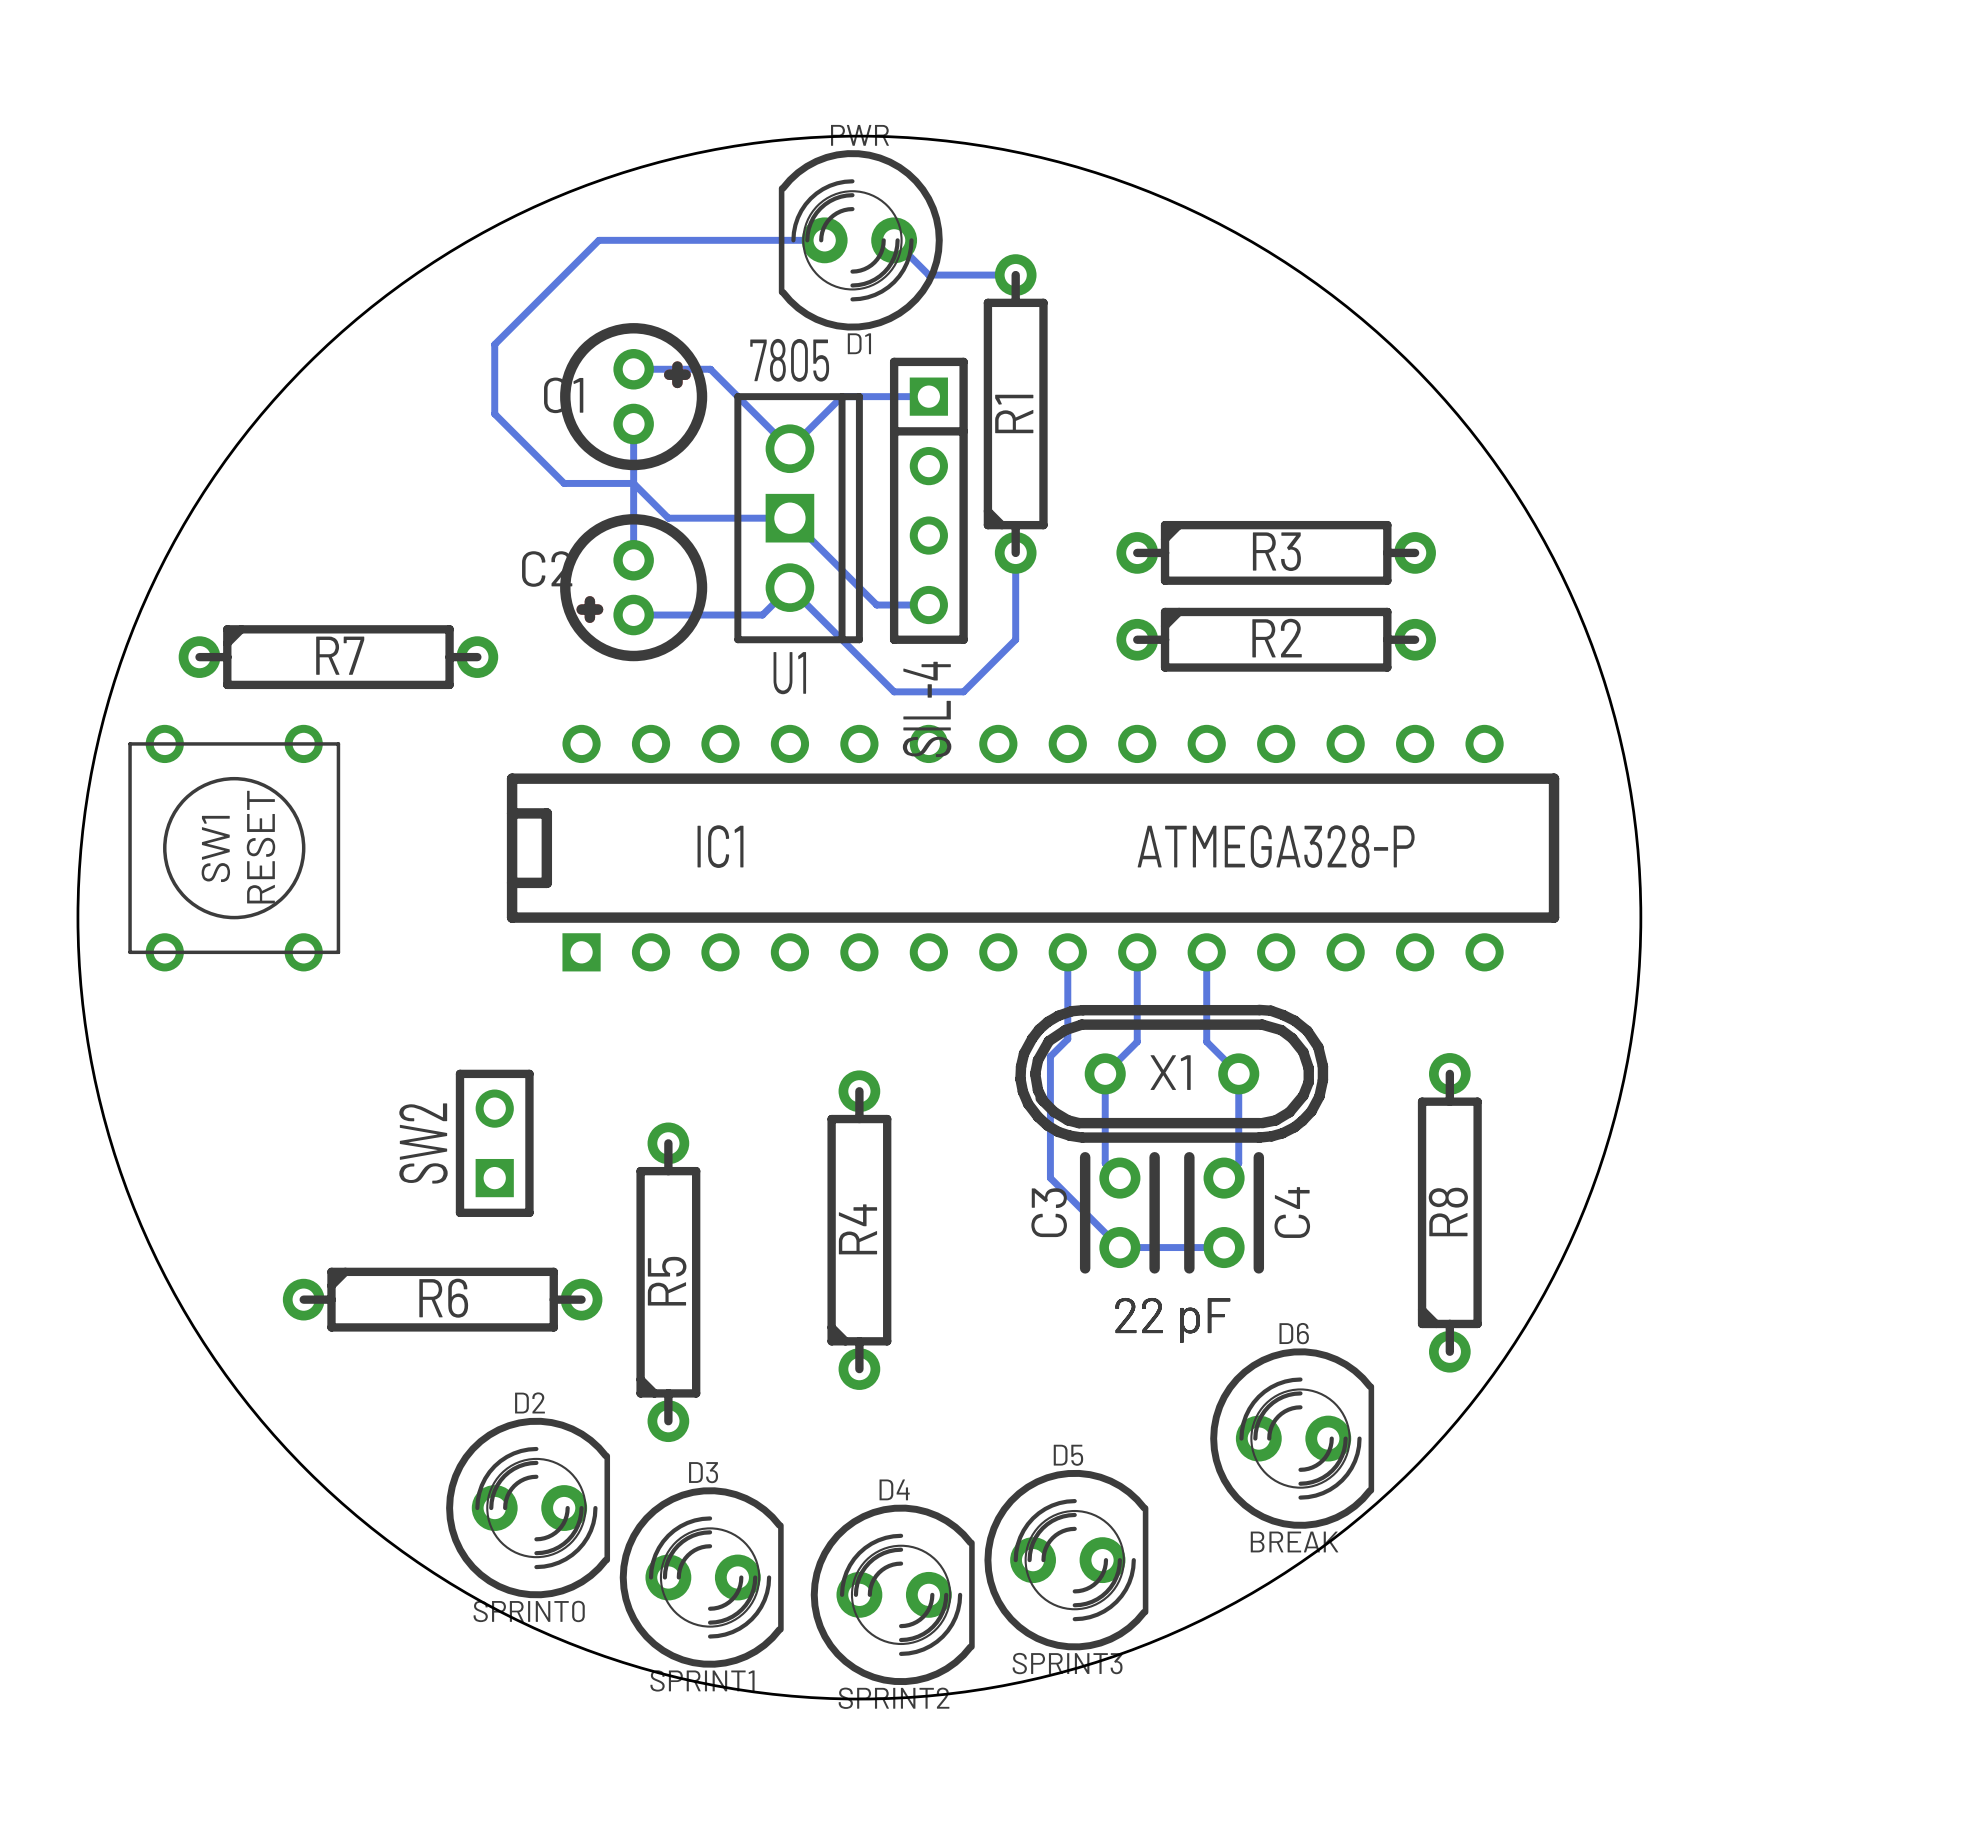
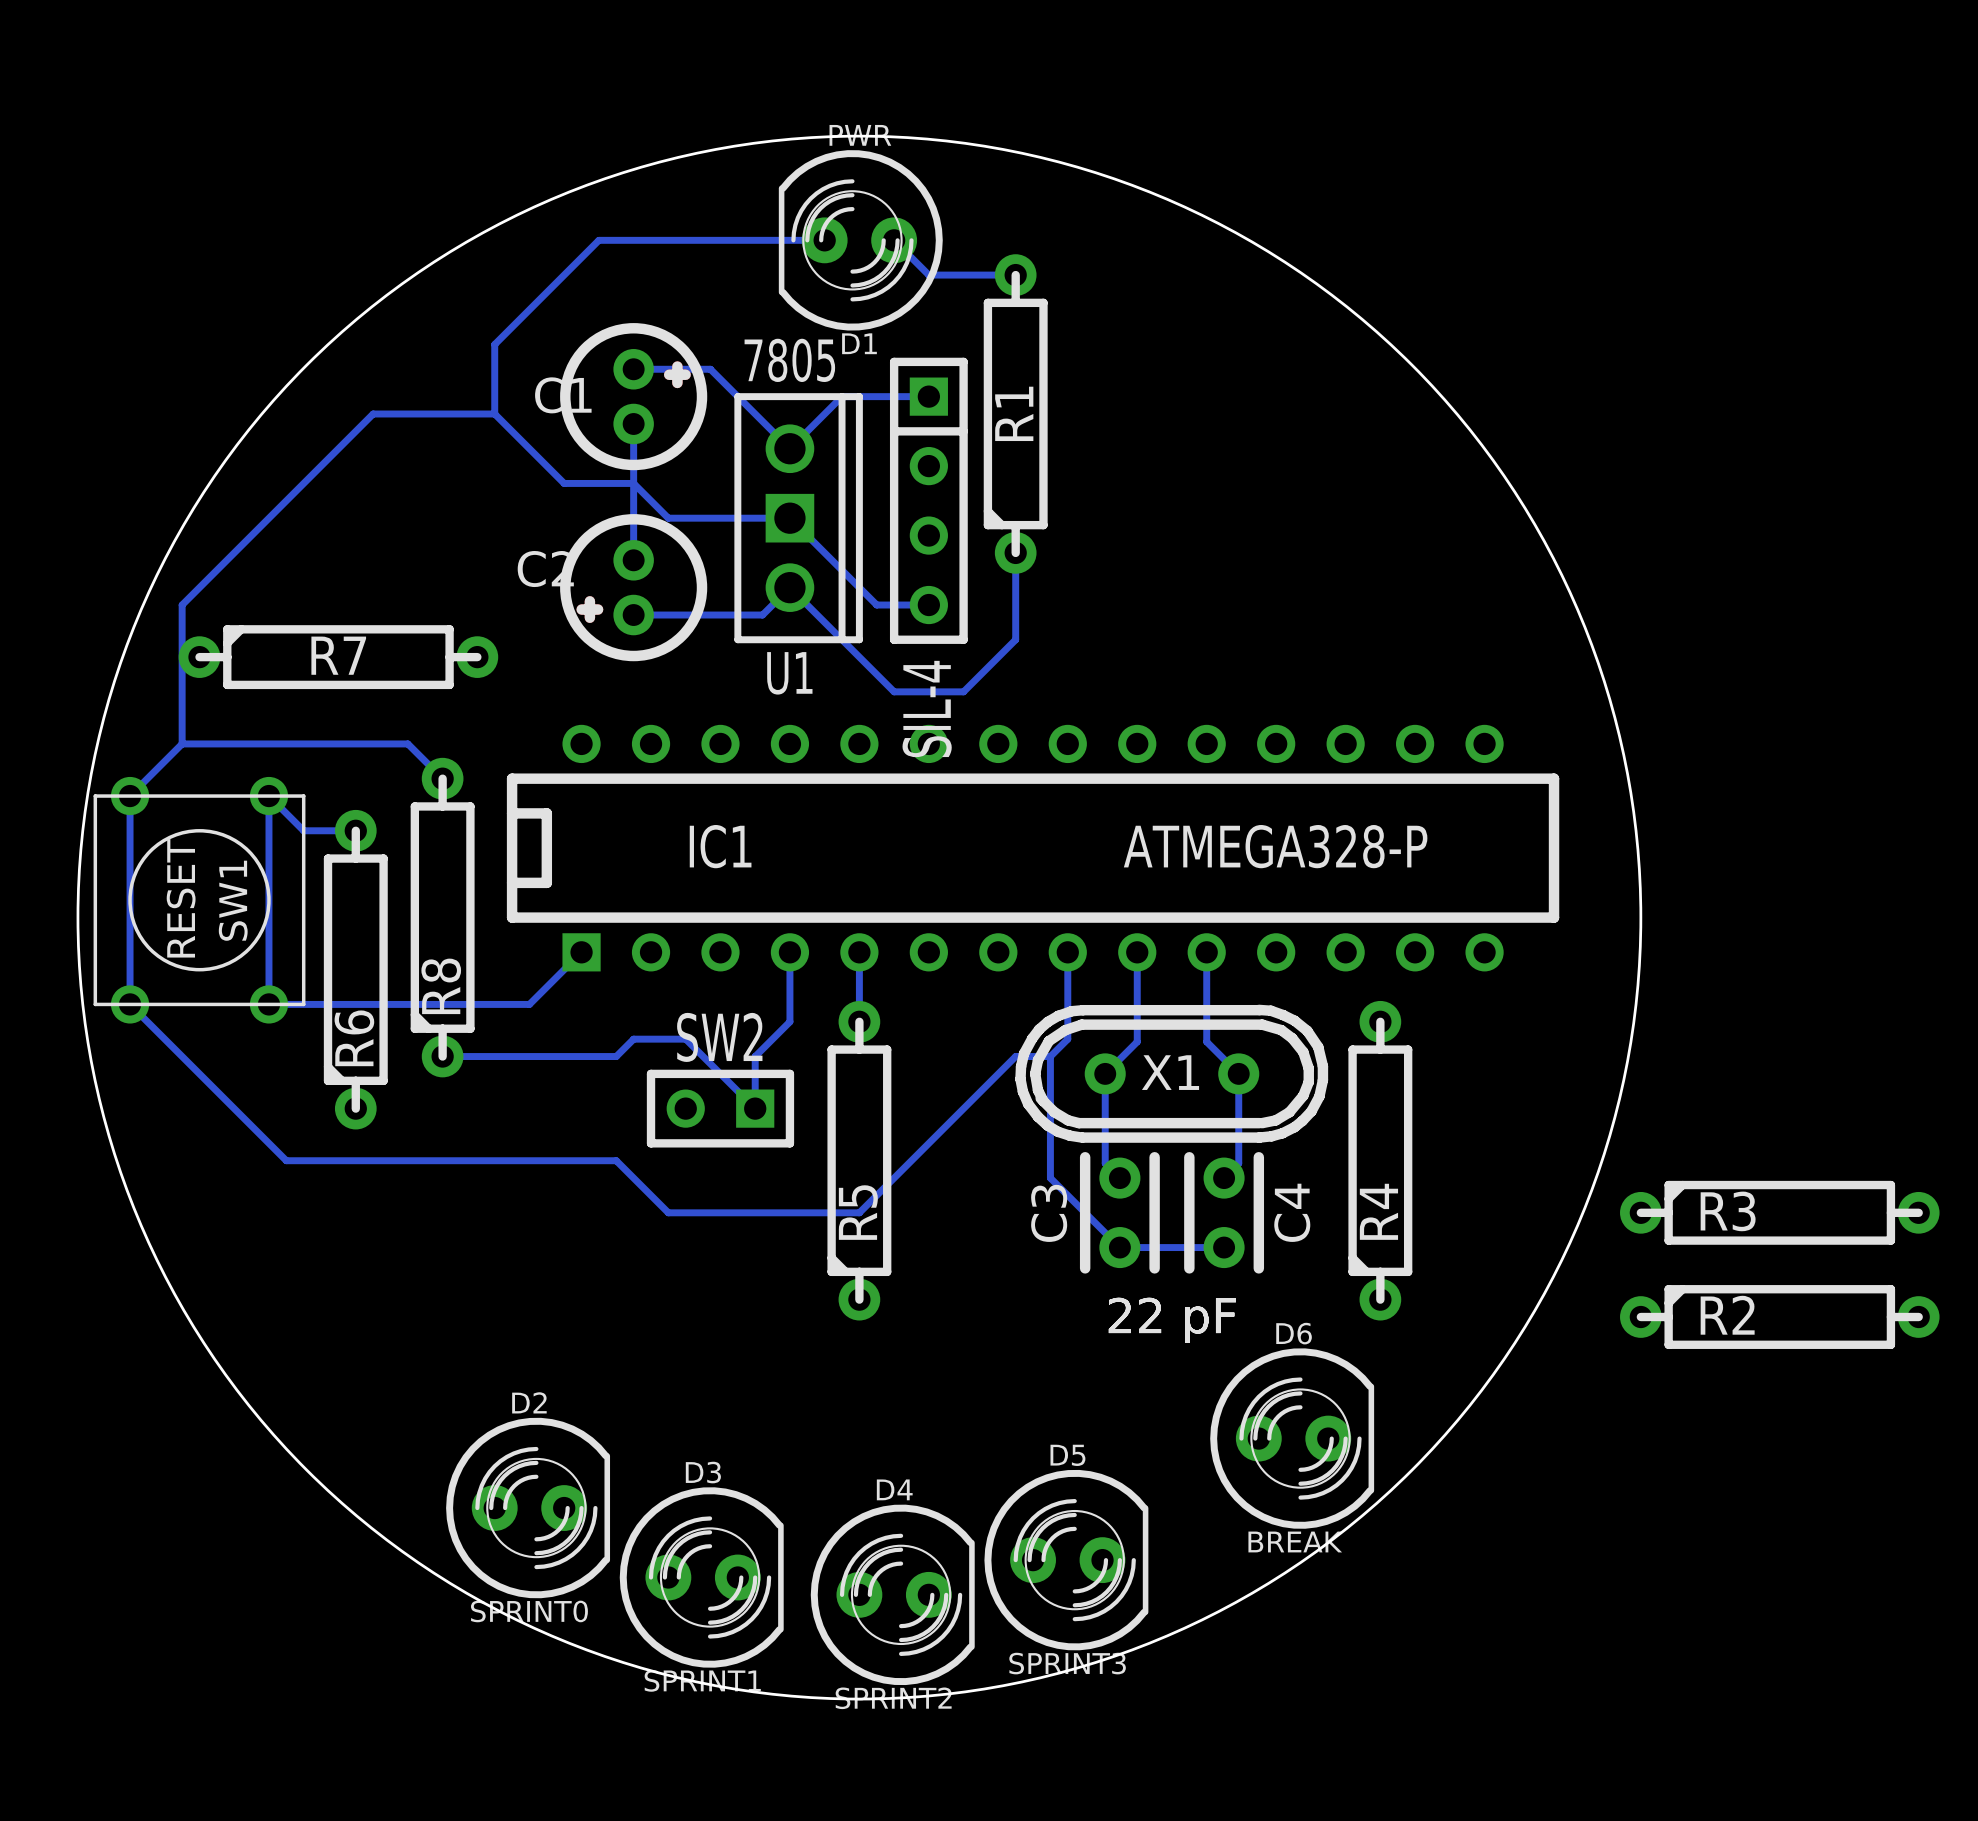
bottom track: none -> (494, 414) (373, 414) (182, 605) (182, 743)
R3 name position: R3 (1276, 551) -> R3 (1728, 1211)
R3 position: (1276, 552) -> (1779, 1212)
R2 name position: R2 (1277, 638) -> R2 (1727, 1315)
R2 position: (1276, 639) -> (1779, 1317)
bottom track: none -> (182, 743) (130, 796) (130, 1004) (286, 1160) (616, 1160) (668, 1212) (859, 1212) (1015, 1056) (1050, 1056)
bottom track: none -> (182, 743) (407, 743) (442, 778)
bottom track: none -> (355, 830) (303, 830) (268, 796) (268, 1004) (529, 1004) (581, 952)
SW1 value position: RESET (260, 847) -> RESET (181, 898)
SW1 name position: SW1 (215, 848) -> SW1 (233, 900)
SW1 position: (234, 848) -> (199, 900)
bottom track: none -> (789, 952) (789, 1021) (755, 1056) (755, 1108) (685, 1039) (633, 1039) (616, 1056) (442, 1056)
bottom track: none -> (859, 952) (859, 1021)
SW2 name position: SW2 (423, 1143) -> SW2 (719, 1037)
SW2 rotation: 0° (494, 1143) -> 90° counterclockwise (720, 1108)
SW2 position: (494, 1143) -> (720, 1108)
R8 name position: R8 (1448, 1211) -> R8 (441, 986)
R8 position: (1449, 1212) -> (442, 917)
R4 name position: R4 (857, 1229) -> R4 (1378, 1211)
R4 position: (859, 1230) -> (1380, 1160)
R5 name position: R5 (667, 1281) -> R5 (858, 1212)
R5 position: (668, 1282) -> (859, 1160)
R6 name position: R6 (443, 1298) -> R6 (354, 1038)
R6 rotation: 0° (442, 1299) -> 90° counterclockwise (355, 969)
R6 position: (442, 1299) -> (355, 969)

